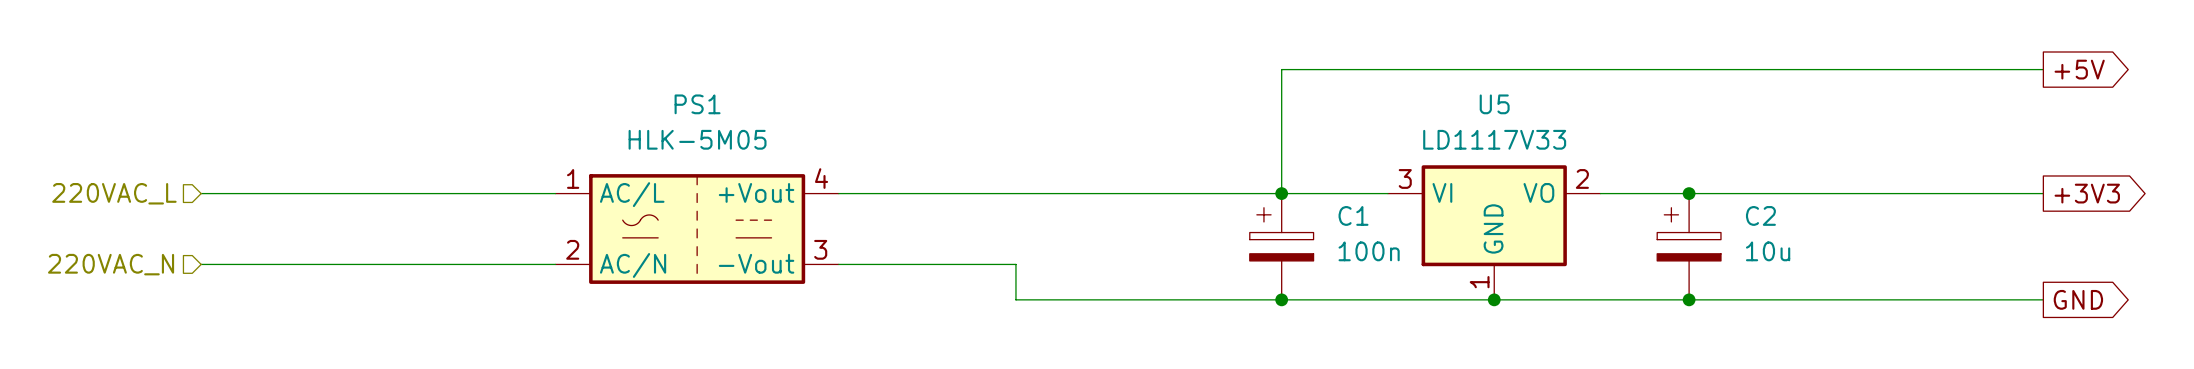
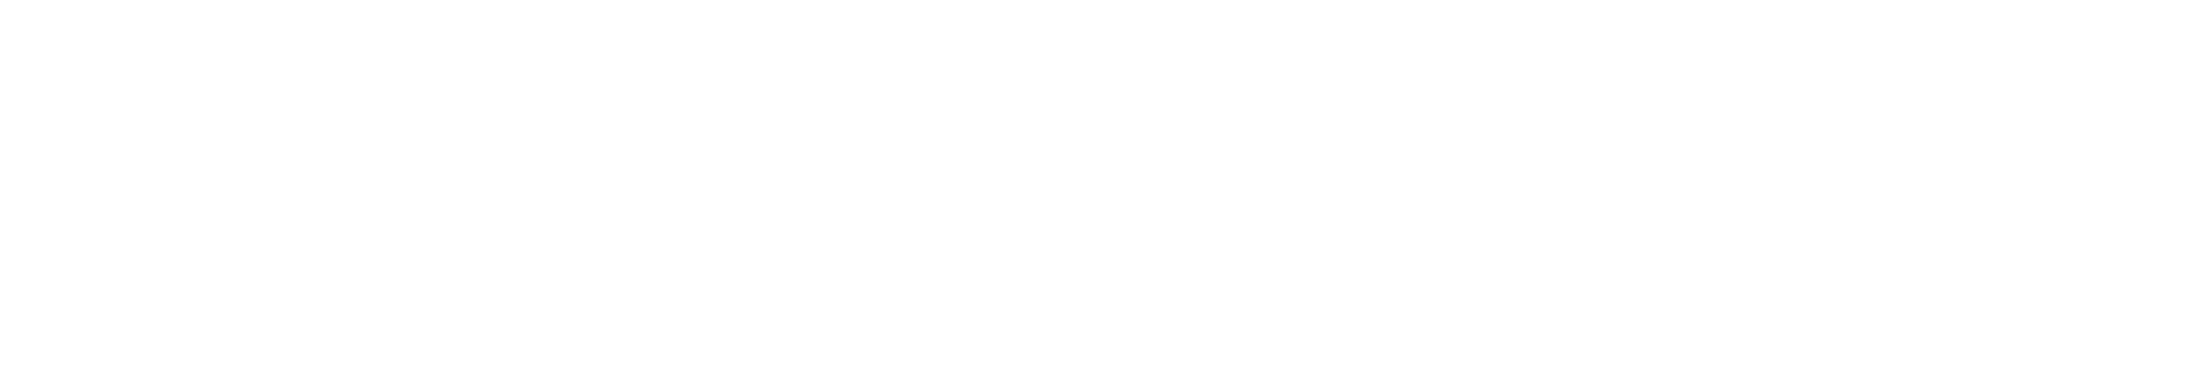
wire: (2043, 69) (1281, 69) (1281, 193) -> none
global label: +5V (2079, 69) -> none
hierarchical label: 220VAC_L (114, 193) -> none
wire: (201, 193) (555, 193) -> none
wire: (838, 193) (1387, 193) -> none
junction: (1281, 193) -> none
wire: (1600, 193) (2043, 193) -> none
junction: (1689, 193) -> none
global label: +3V3 (2087, 193) -> none
PS1: HLK-5M05 (697, 229) -> none
U5: LD1117V33 (1494, 232) -> none
C1: 100n (1281, 246) -> none
C2: 10u (1689, 246) -> none
hierarchical label: 220VAC_N (111, 264) -> none
wire: (201, 264) (555, 264) -> none
wire: (838, 264) (1015, 264) (1015, 299) (2043, 299) -> none
junction: (1281, 299) -> none
junction: (1494, 299) -> none
junction: (1689, 299) -> none
global label: GND (2078, 299) -> none

